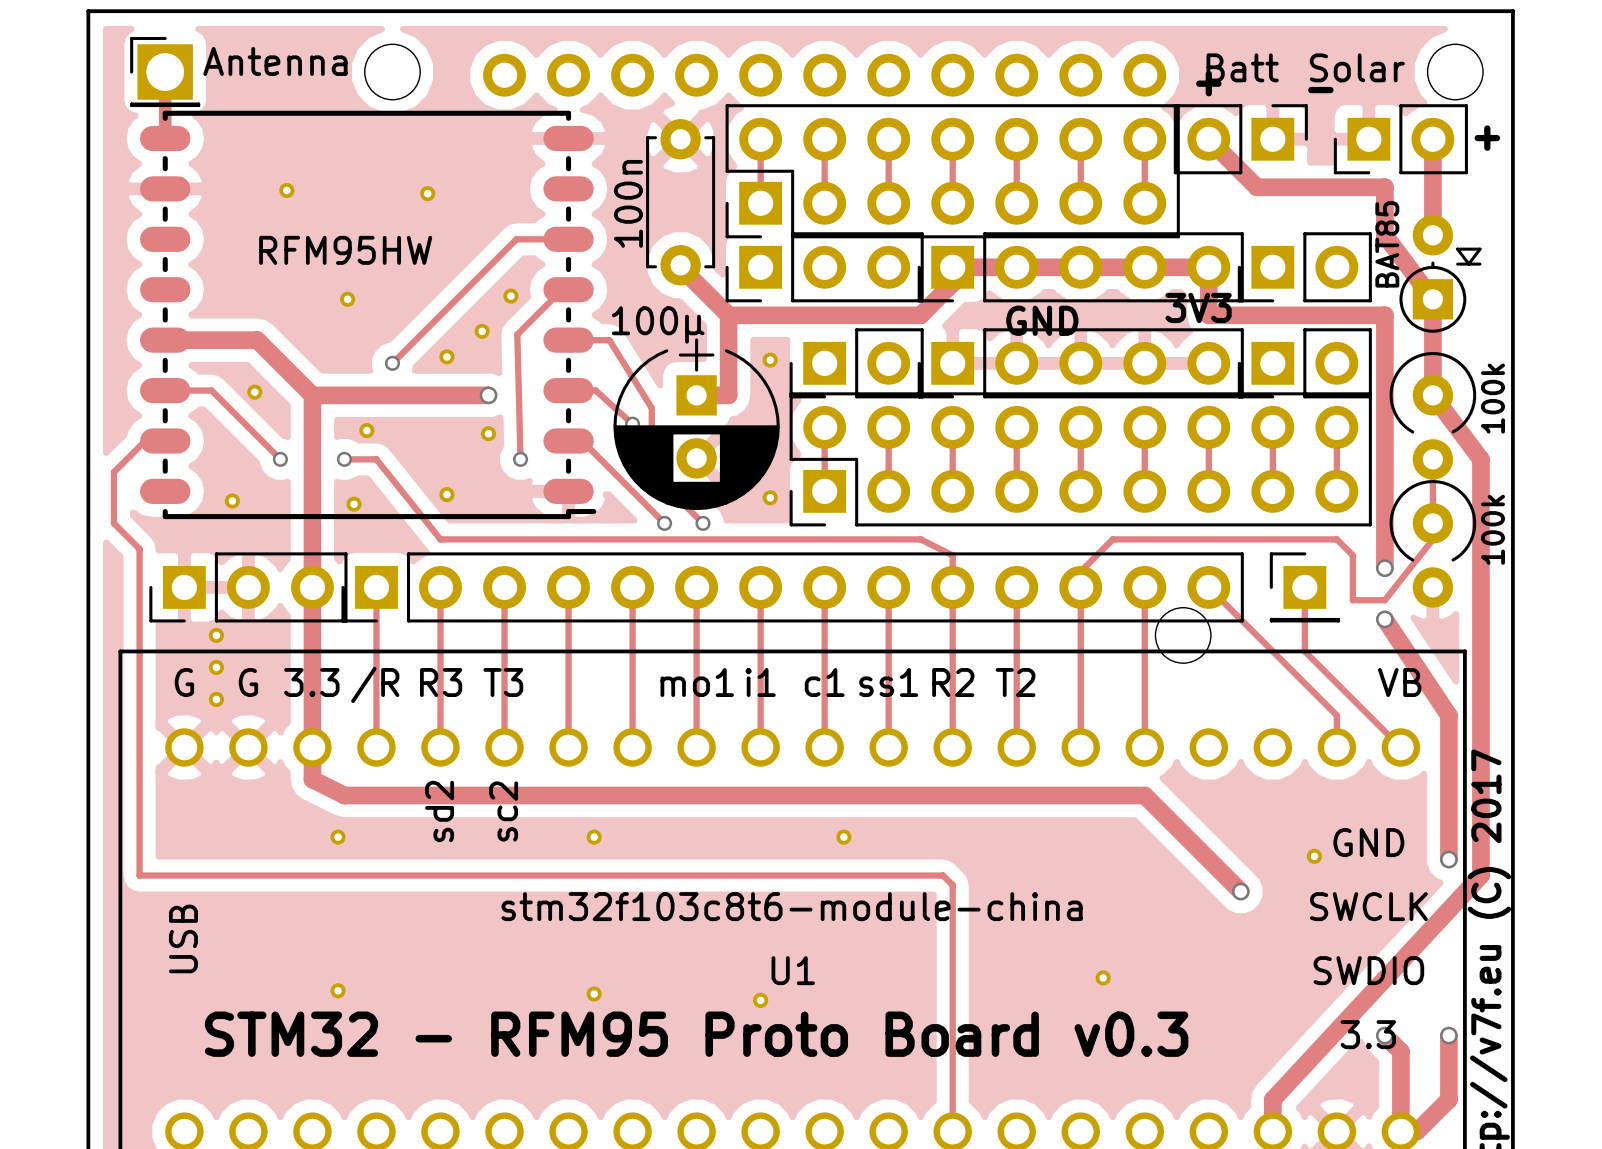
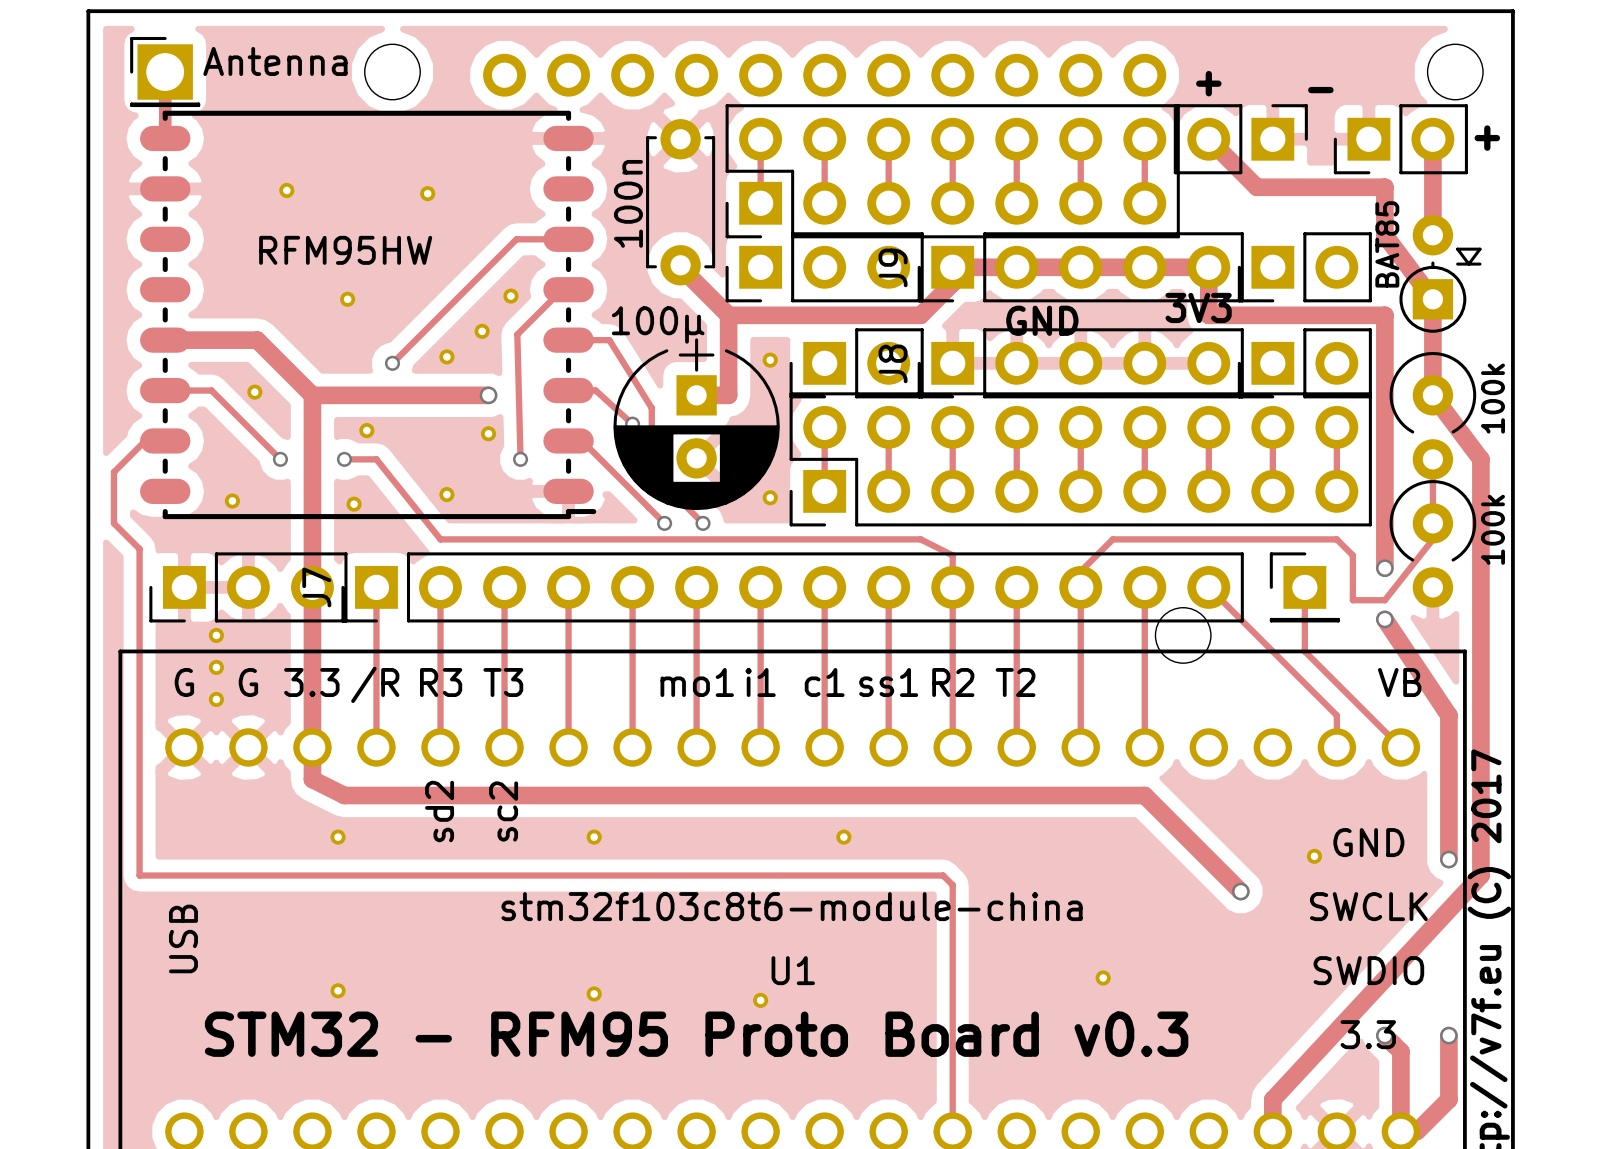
part value: Batt (1242, 67) -> none
part value: Solar (1357, 67) -> none
J9 name: none -> J9 (893, 267)
J8 name: none -> J8 (893, 363)
J7 name: none -> J7 (316, 587)

